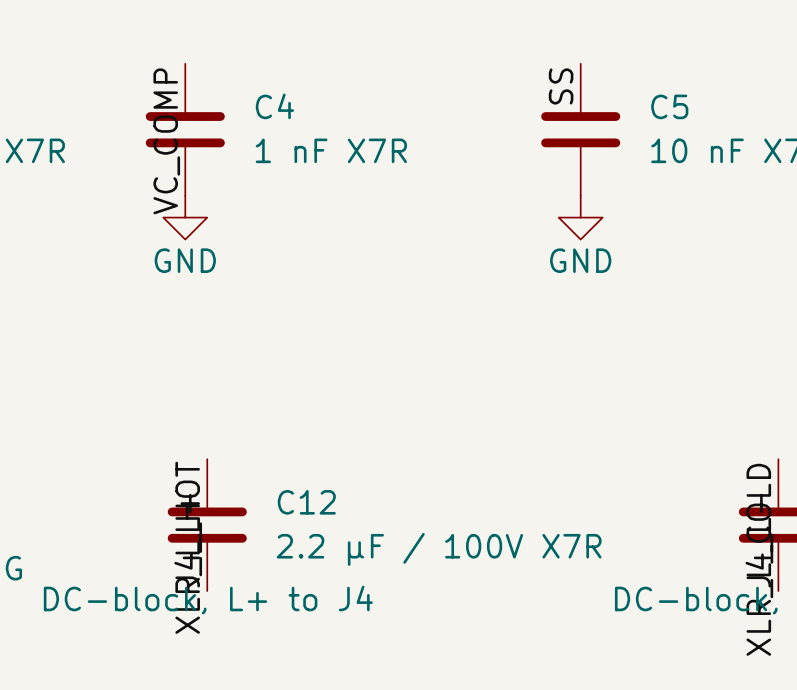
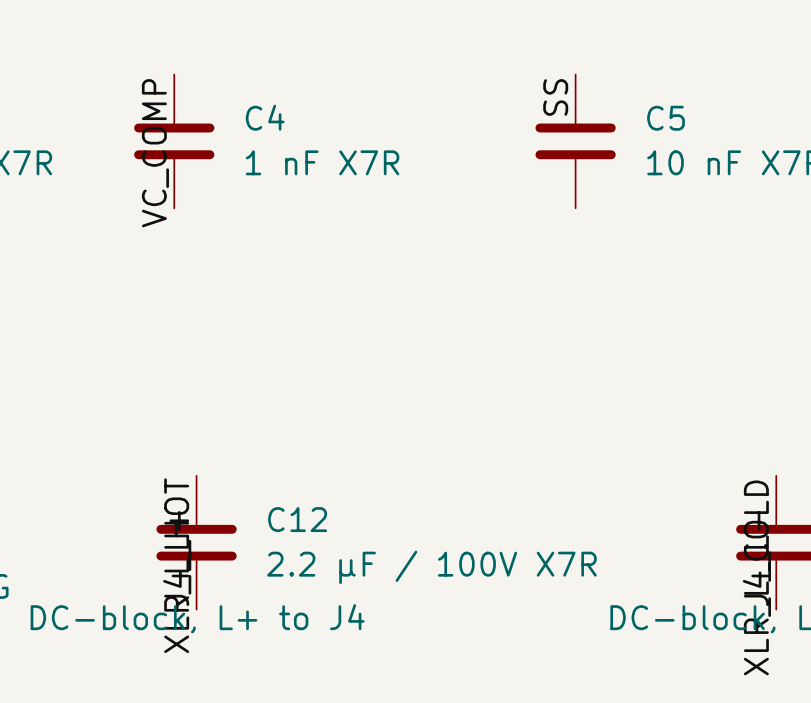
power symbol: GND (185, 217) -> none
power symbol: GND (580, 217) -> none

